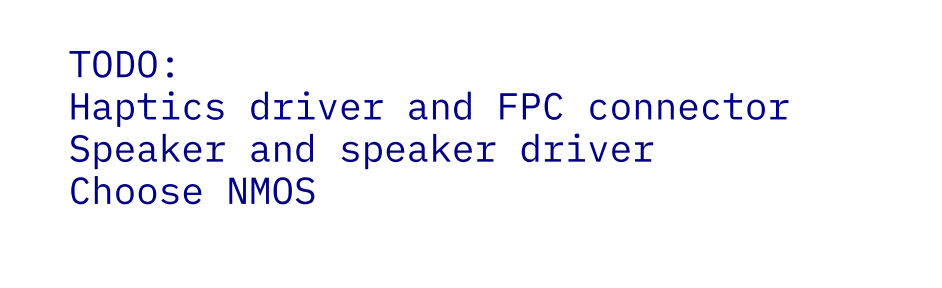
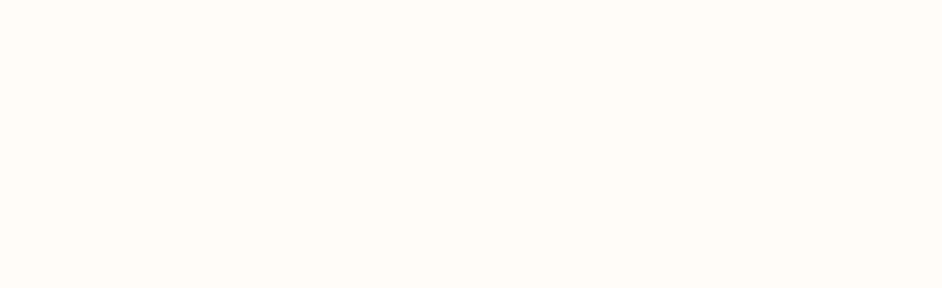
text: TODO: (121, 64) -> none
text: Haptics driver and FPC connector (430, 109) -> none
text: Speaker and speaker driver (361, 151) -> none
text: Choose NMOS (192, 190) -> none

